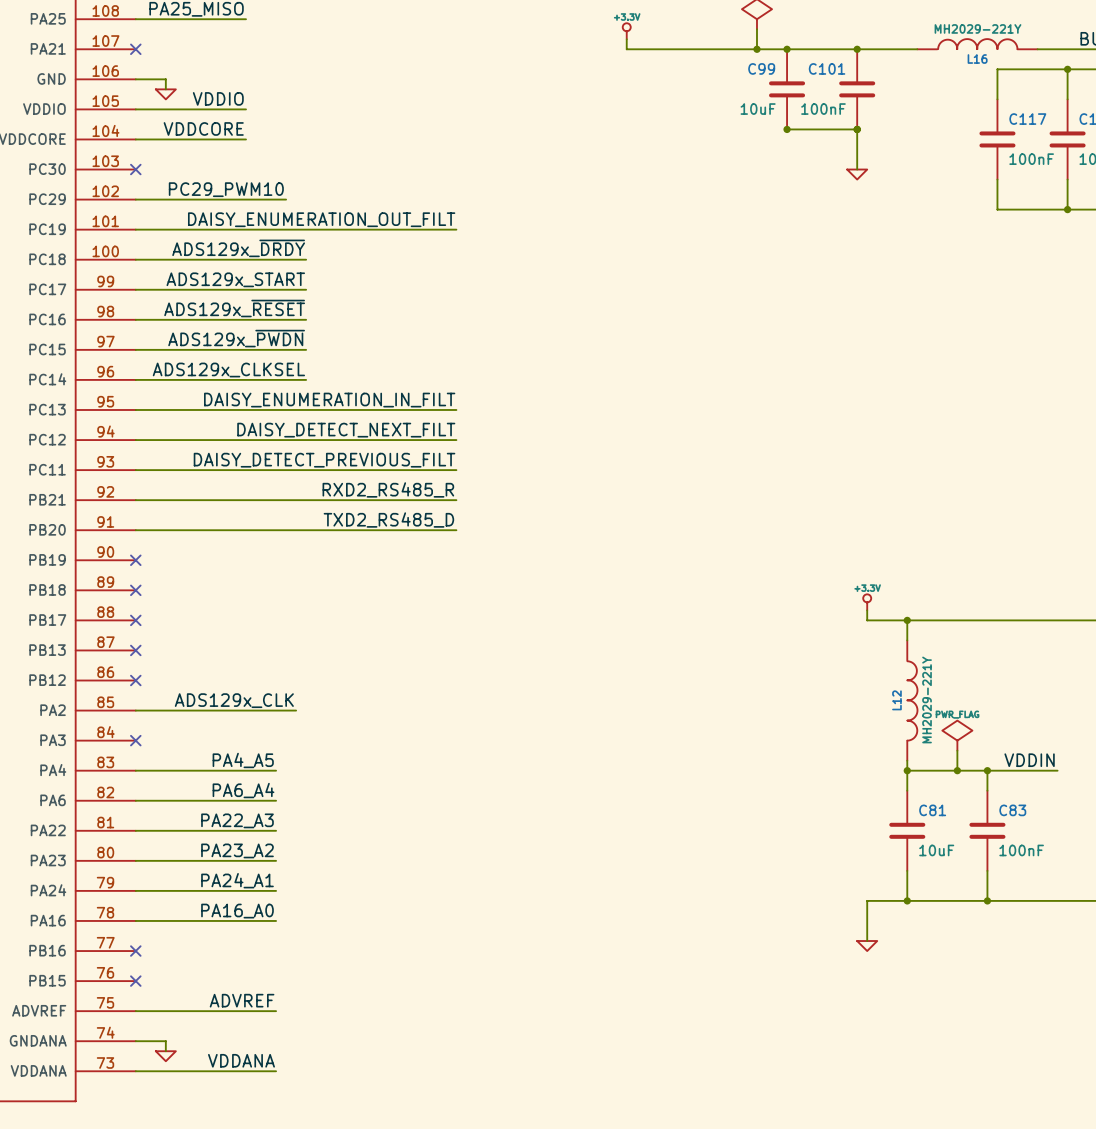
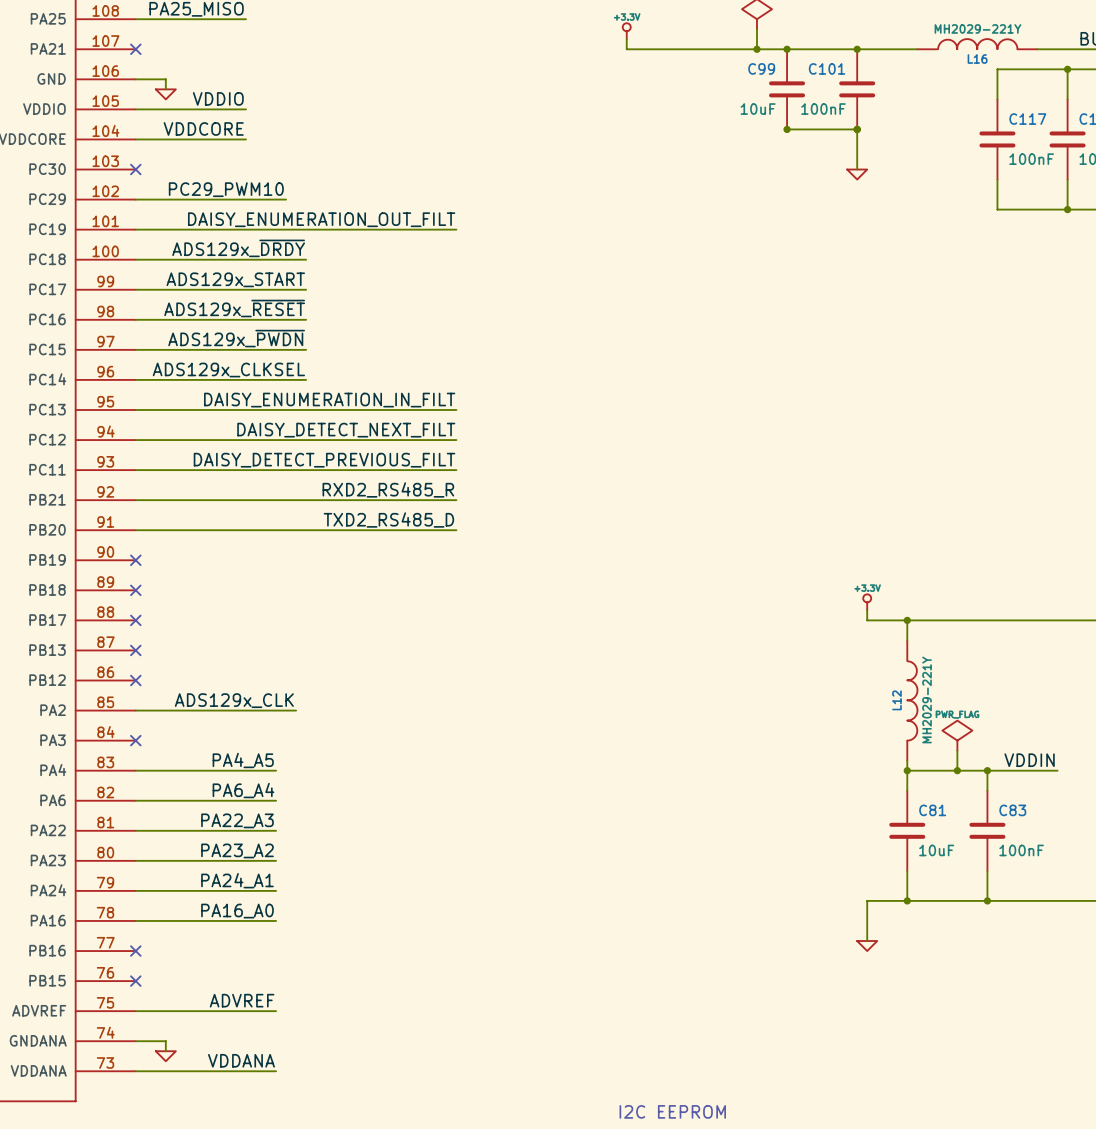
text: none -> I2C EEPROM (672, 1111)

